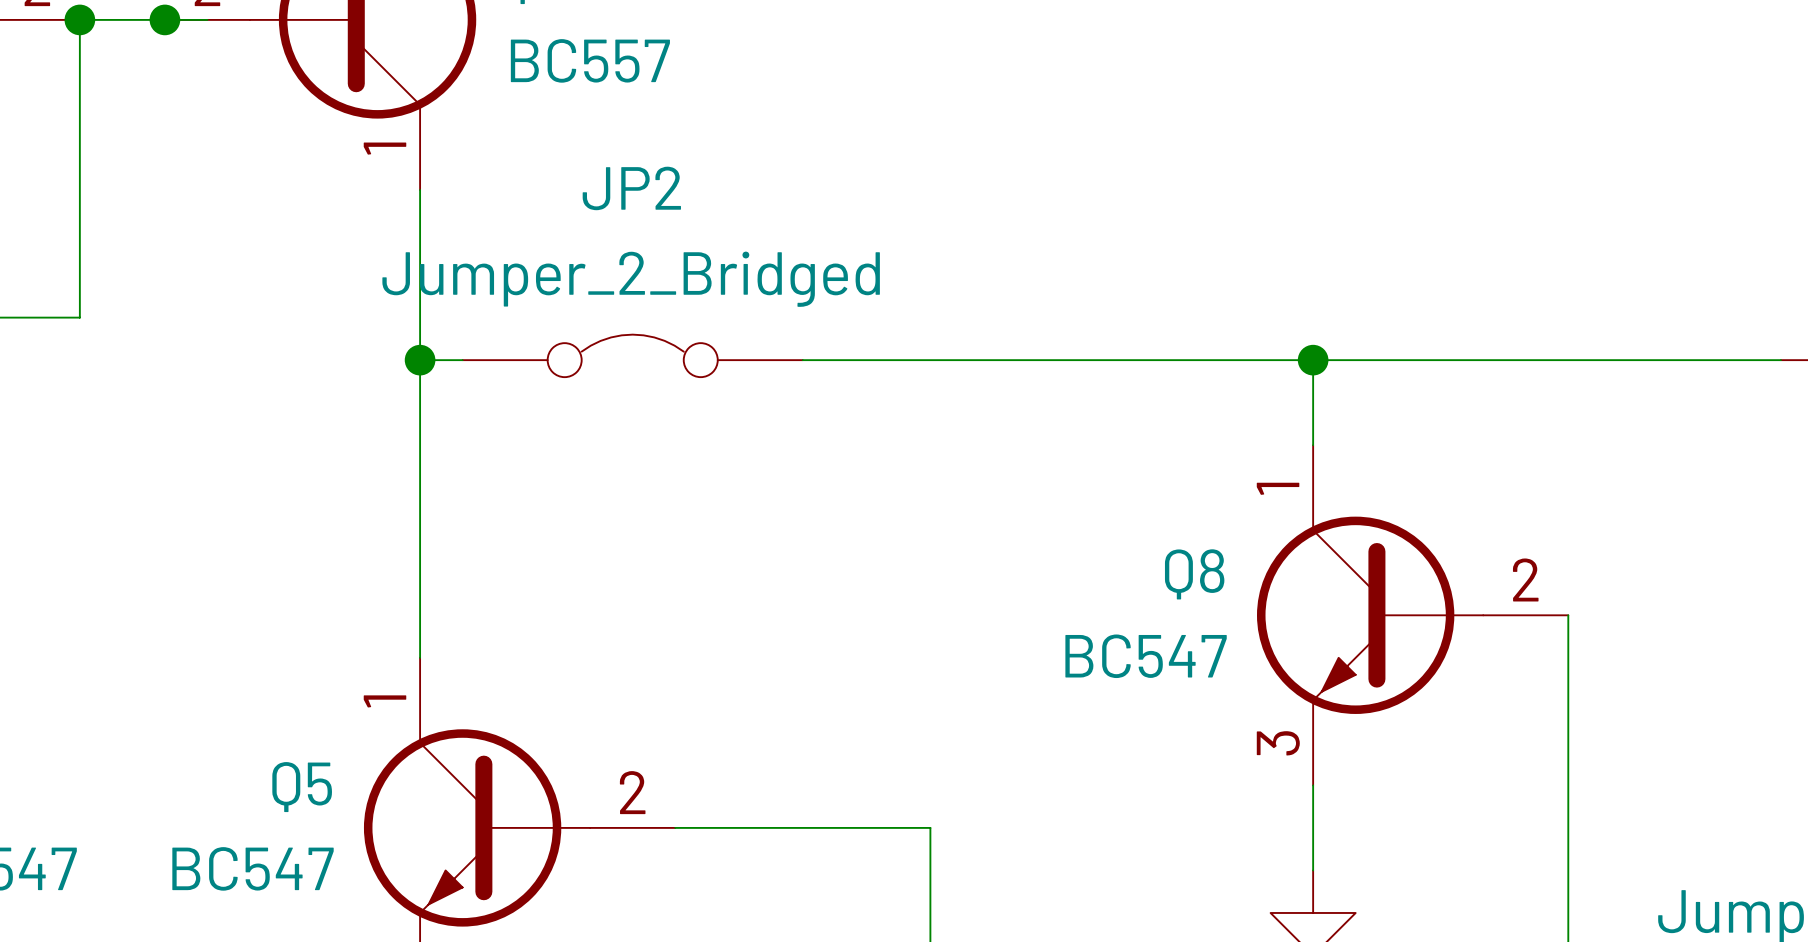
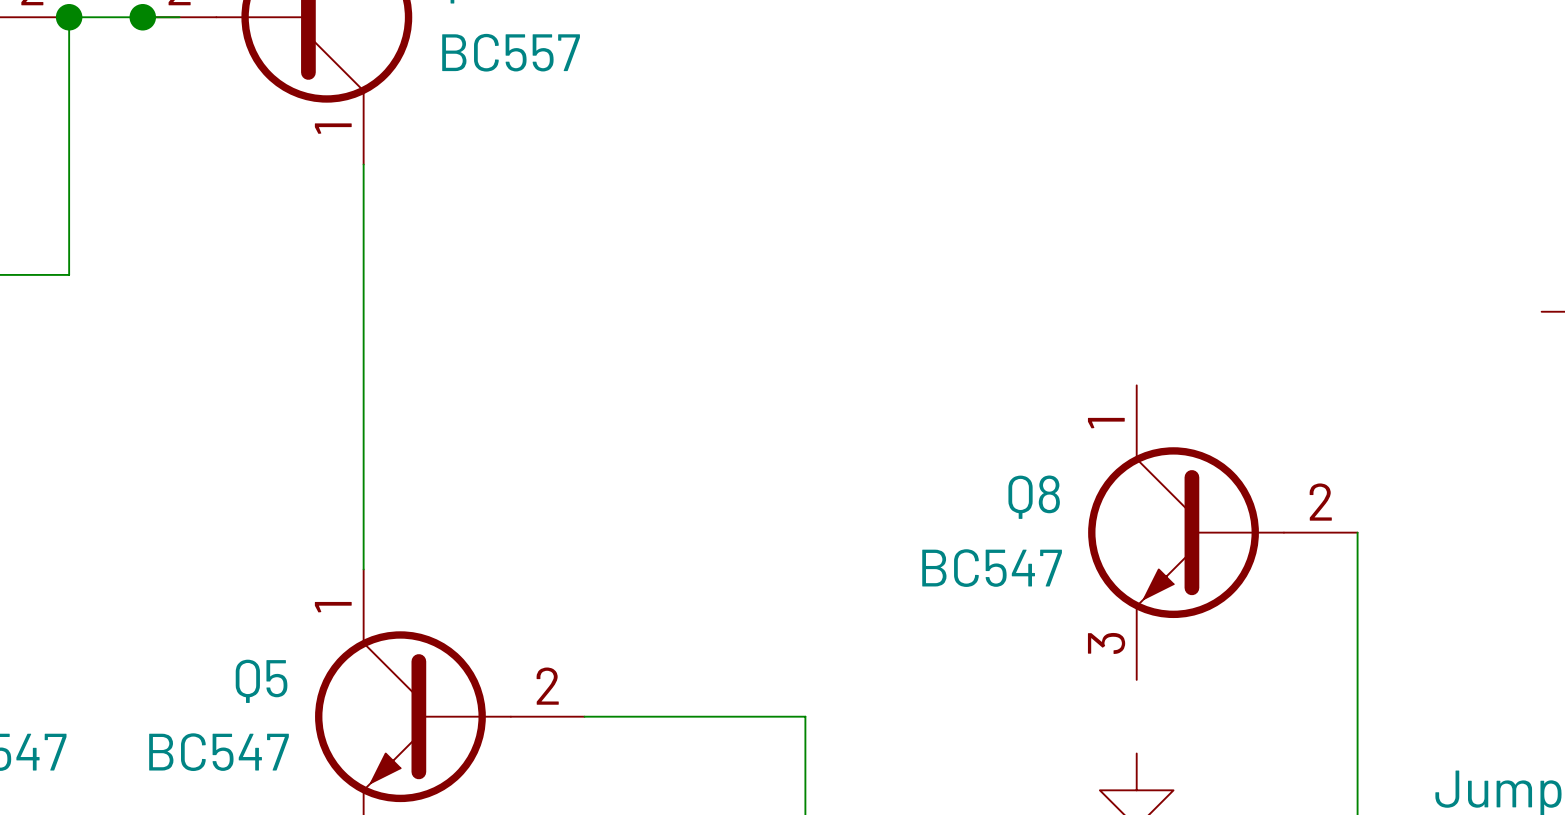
JP2: Jumper_2_Bridged (632, 355) -> none
wire: (420, 360) (462, 360) -> none
junction: (420, 360) -> none
wire: (802, 360) (1780, 360) -> none
wire: (1313, 360) (1313, 445) -> none
junction: (1313, 360) -> none
wire: (1313, 785) (1313, 870) -> none

